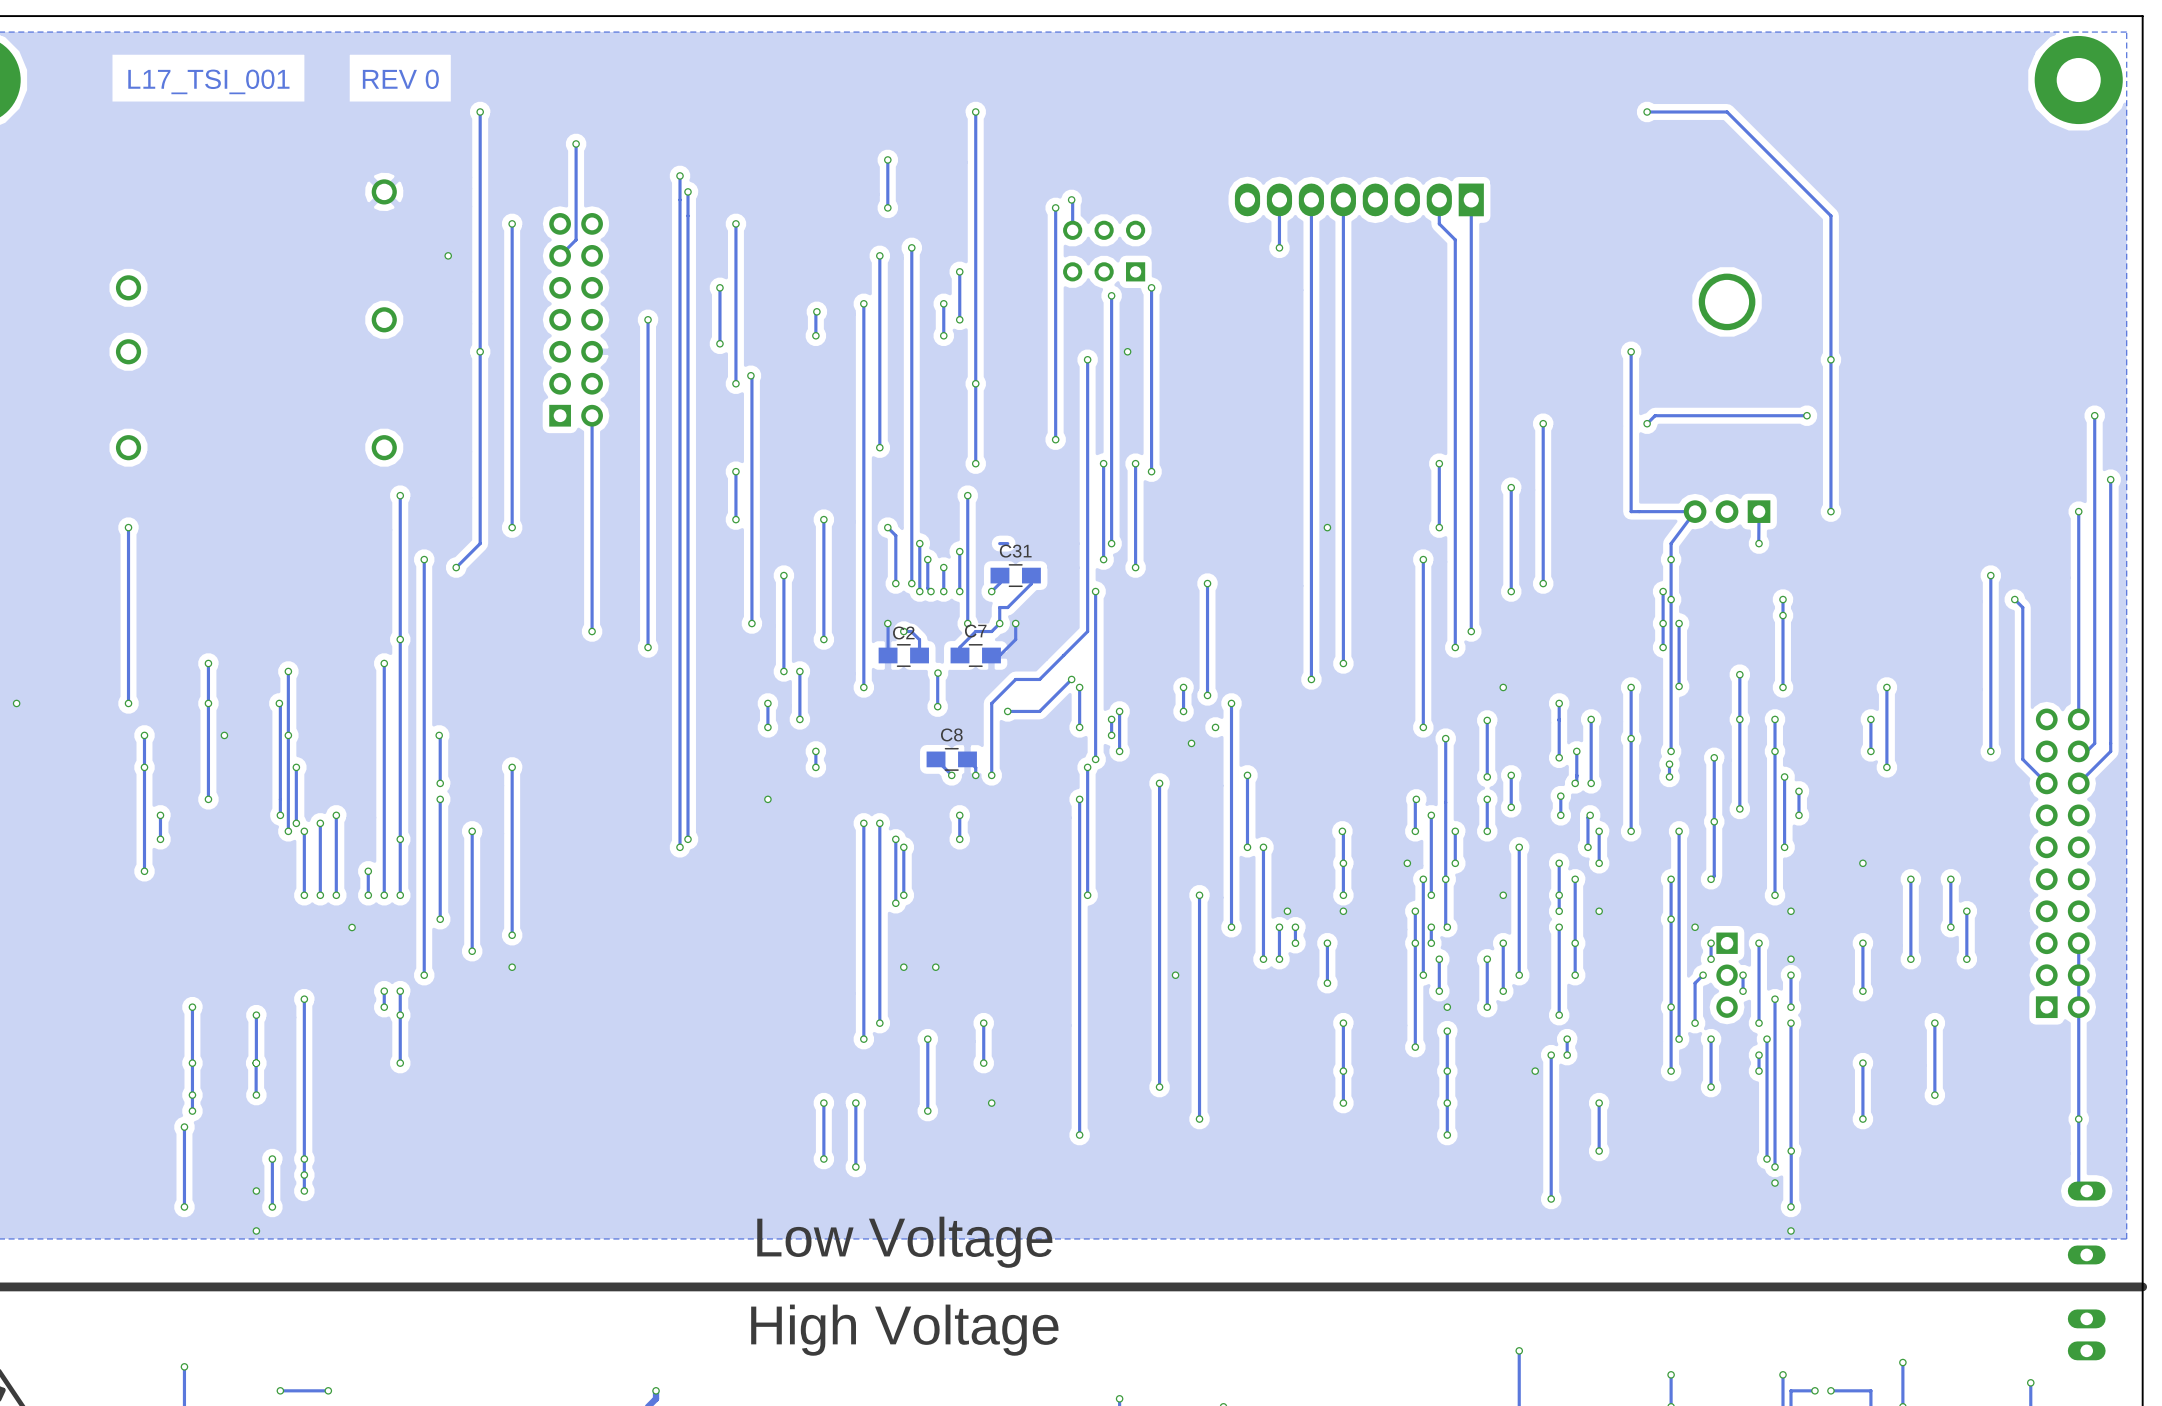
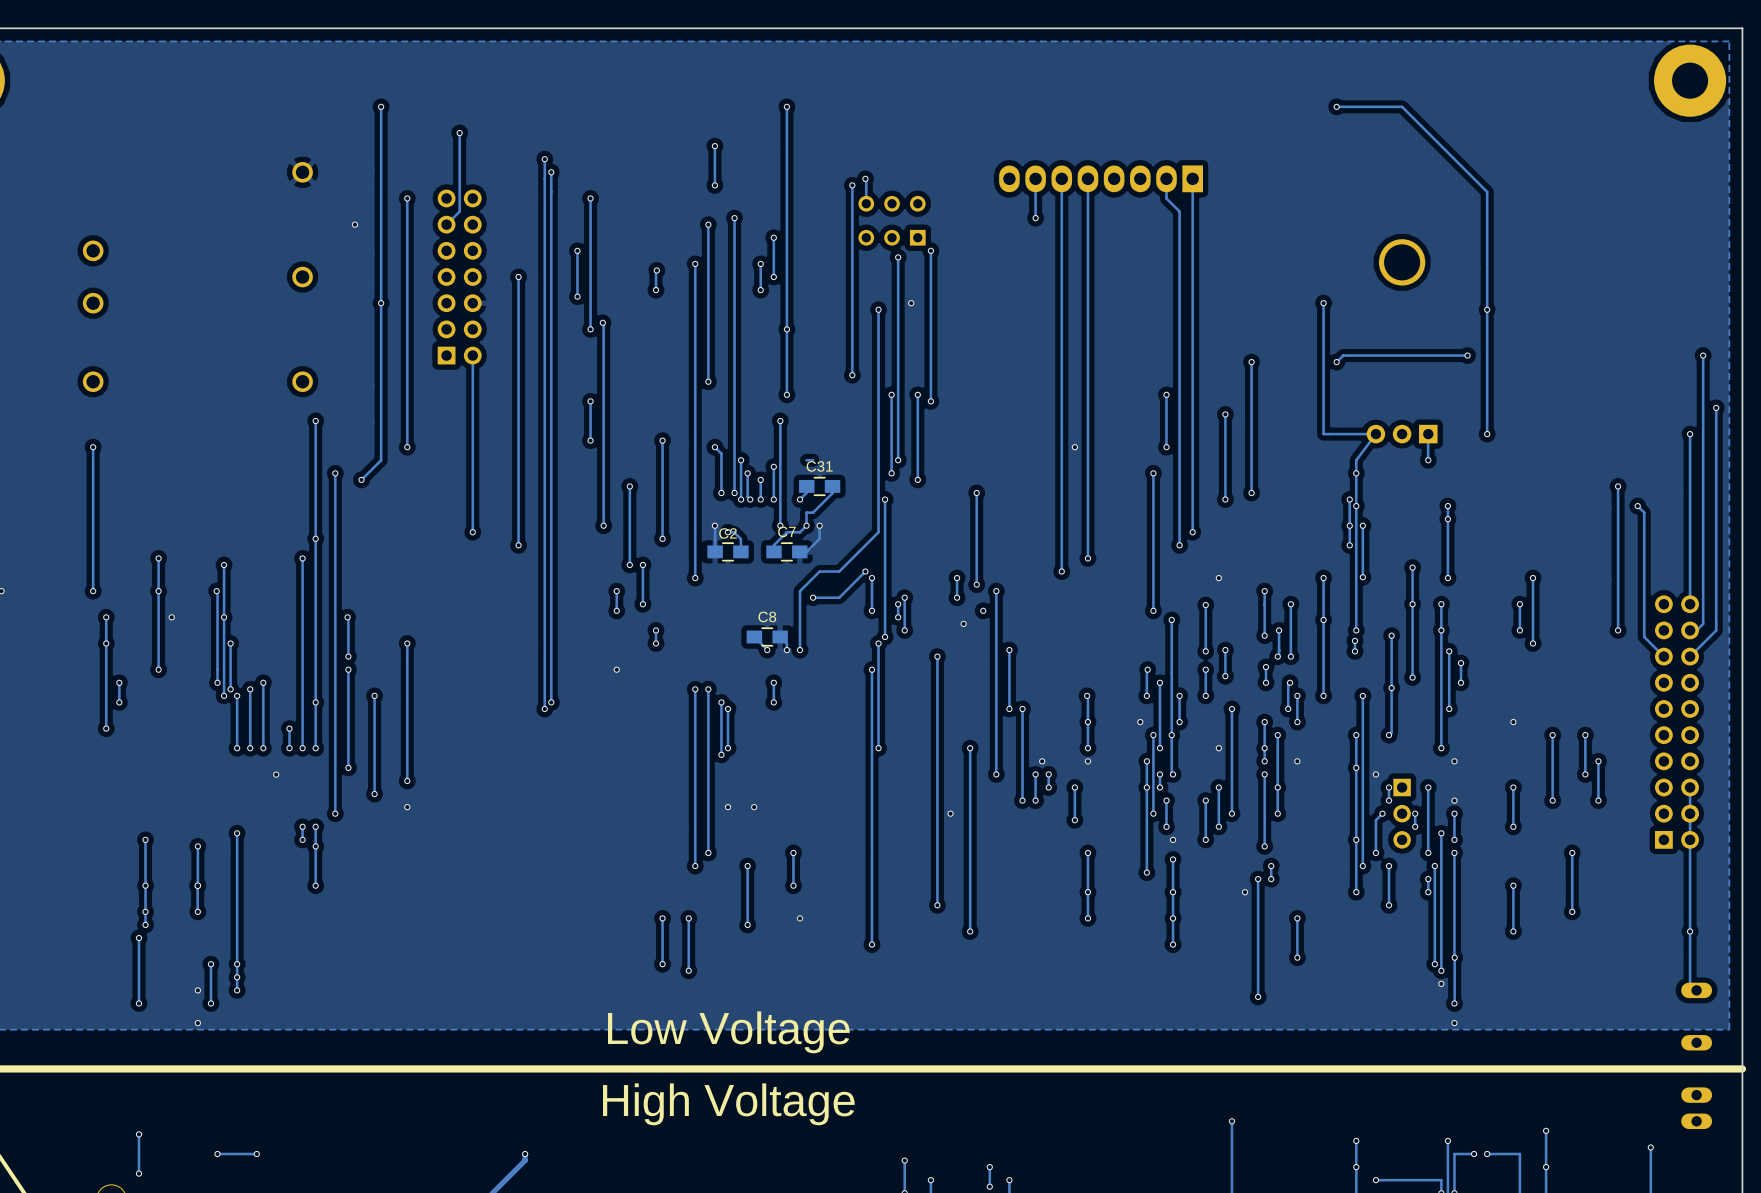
text: REV 0 (400, 79) -> none
text: L17_TSI_001 (208, 81) -> none
track: (938, 673) (937, 706) -> none
via: (938, 673) -> none
via: (937, 706) -> none

